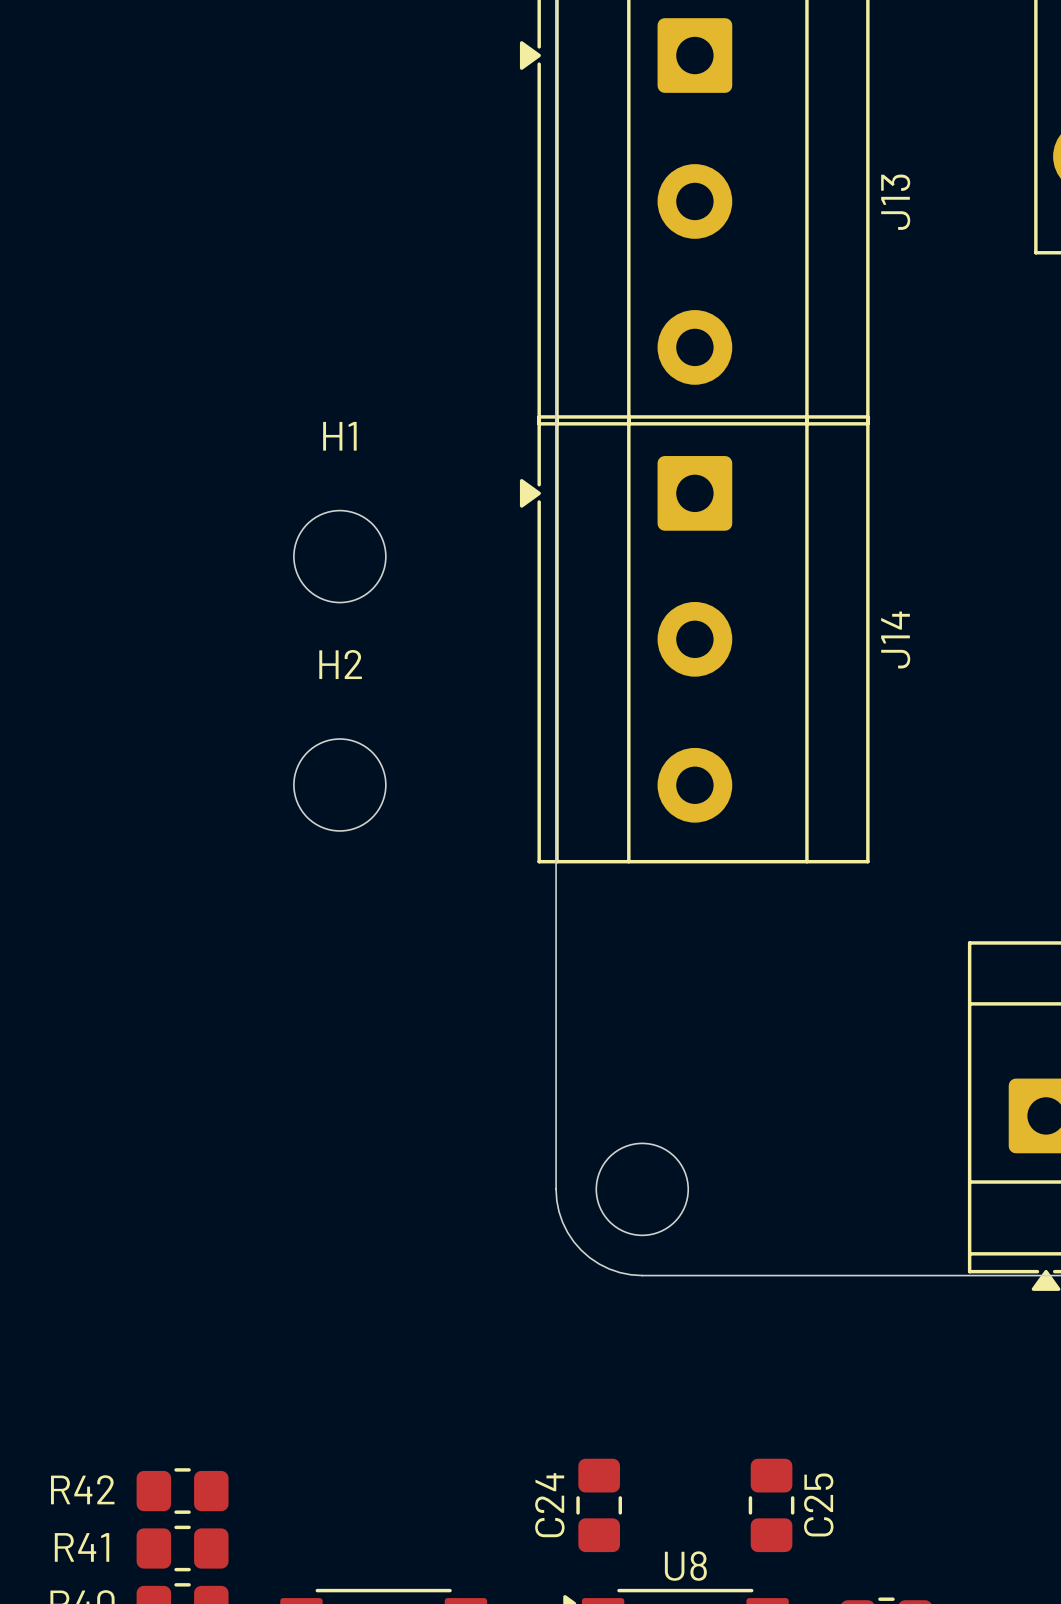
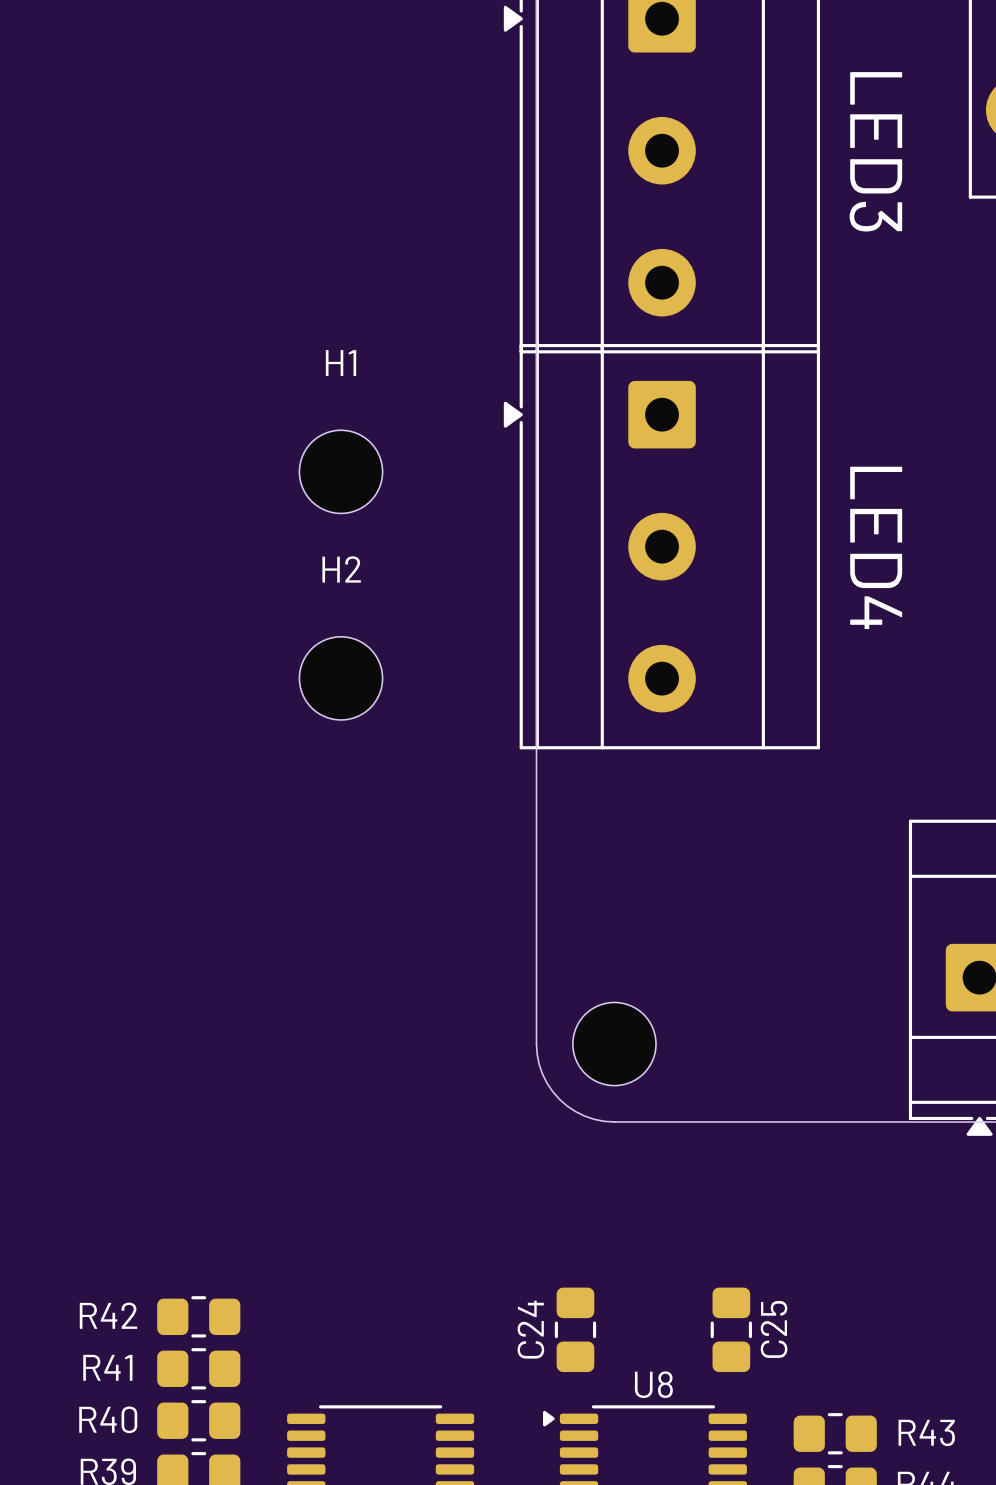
J13 name: J13 (895, 202) -> none
J13 value: none -> LED3 (875, 151)
J14 name: J14 (895, 639) -> none
J14 value: none -> LED4 (876, 547)

